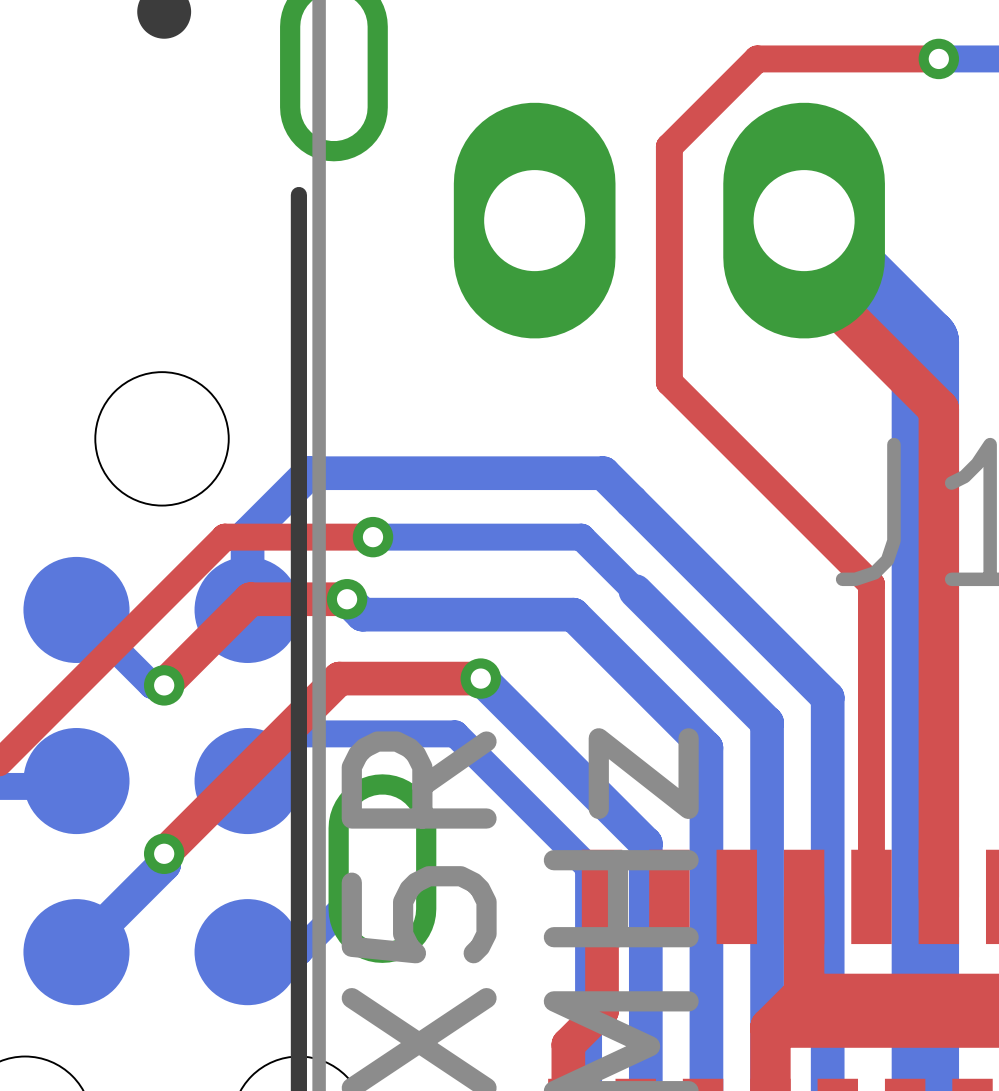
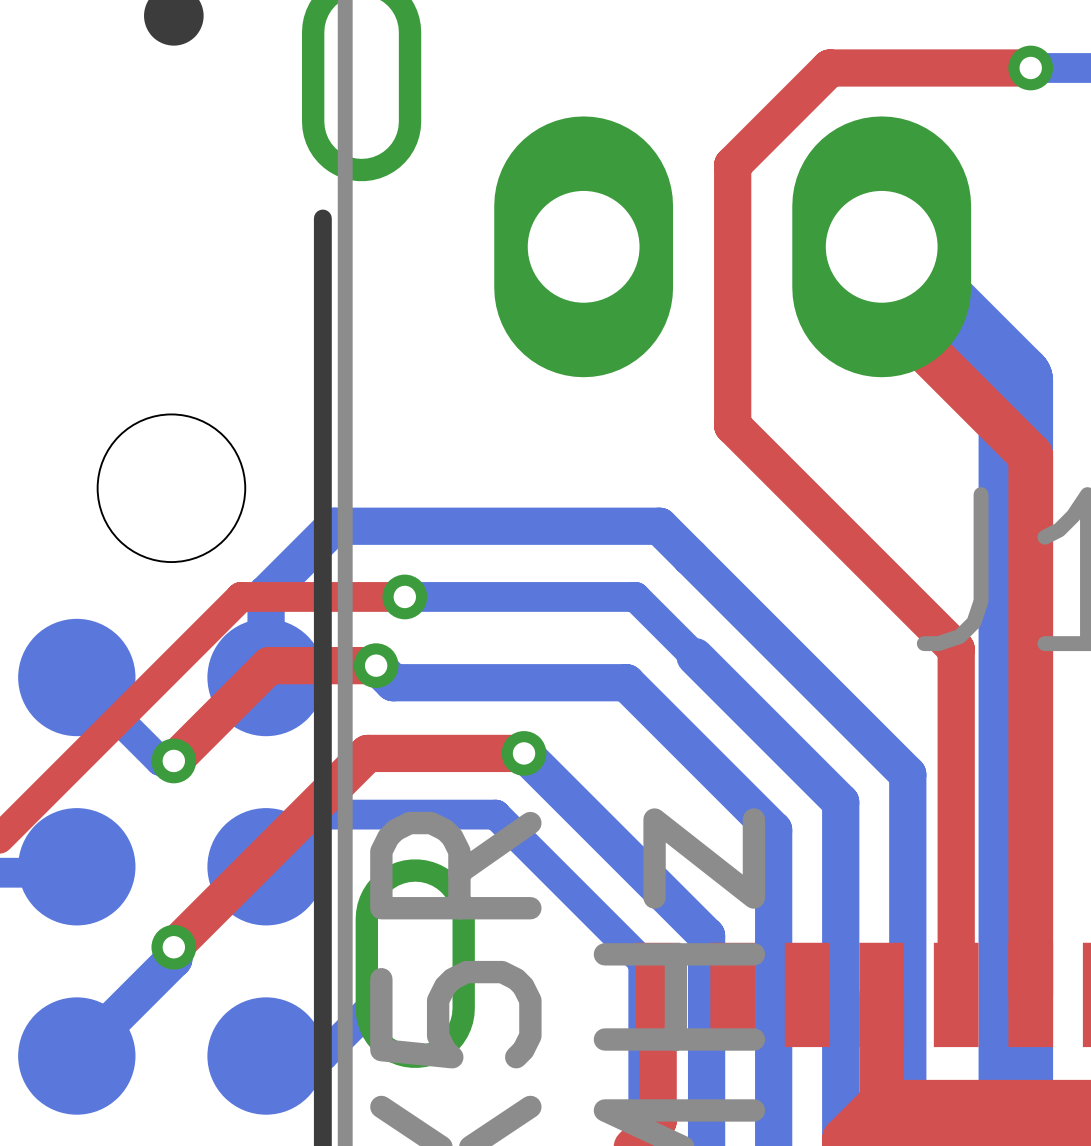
top track width: thin (938, 58) (757, 58) (669, 146) (669, 382) (871, 584) (871, 896) -> thick (1030, 67) (829, 67) (732, 165) (732, 425) (956, 649) (956, 994)

